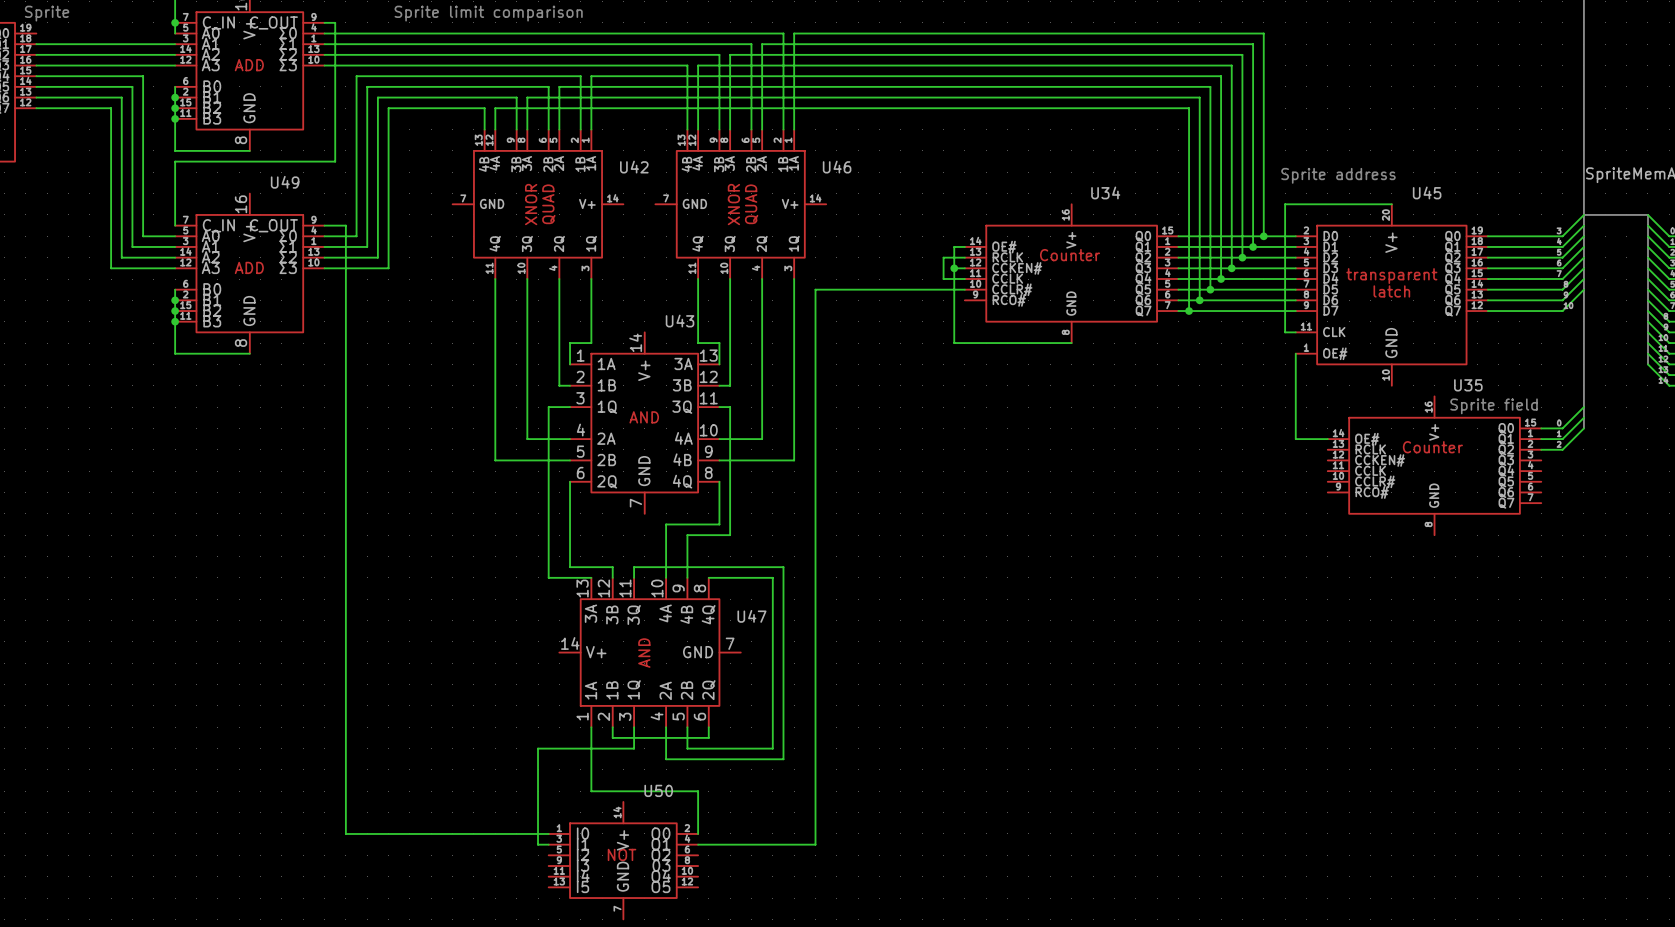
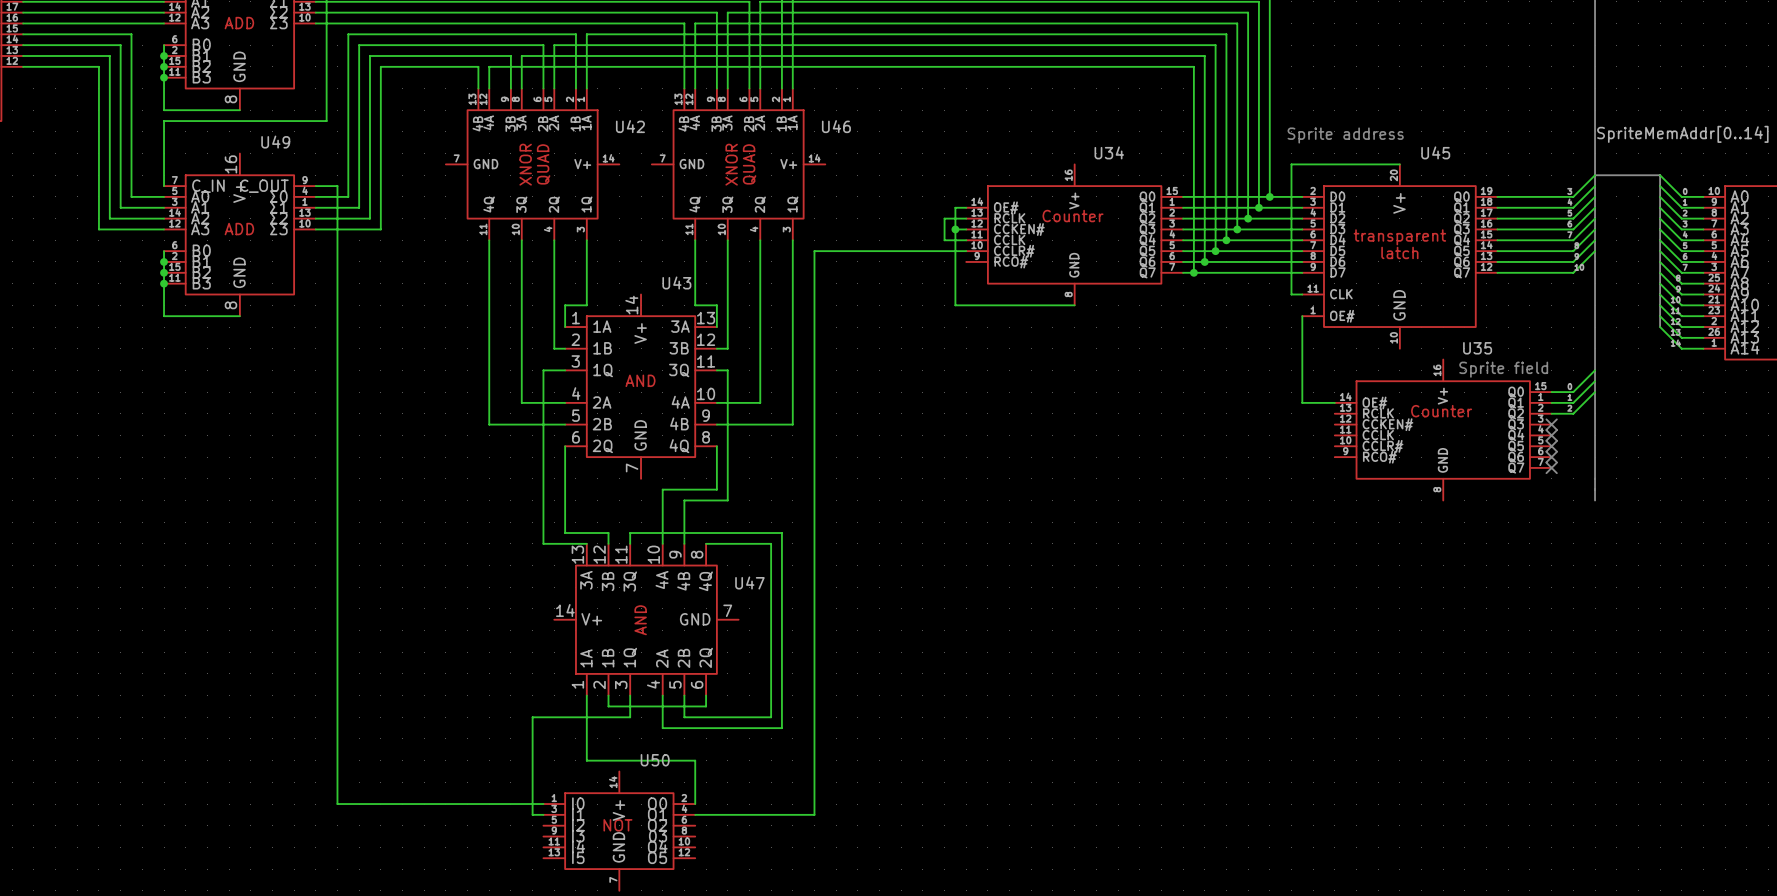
bus: none -> (1595, 392) (1595, 500)
no-connect mark: none -> (1551, 424)
no-connect mark: none -> (1551, 435)
no-connect mark: none -> (1551, 446)
no-connect mark: none -> (1551, 457)
no-connect mark: none -> (1551, 467)

